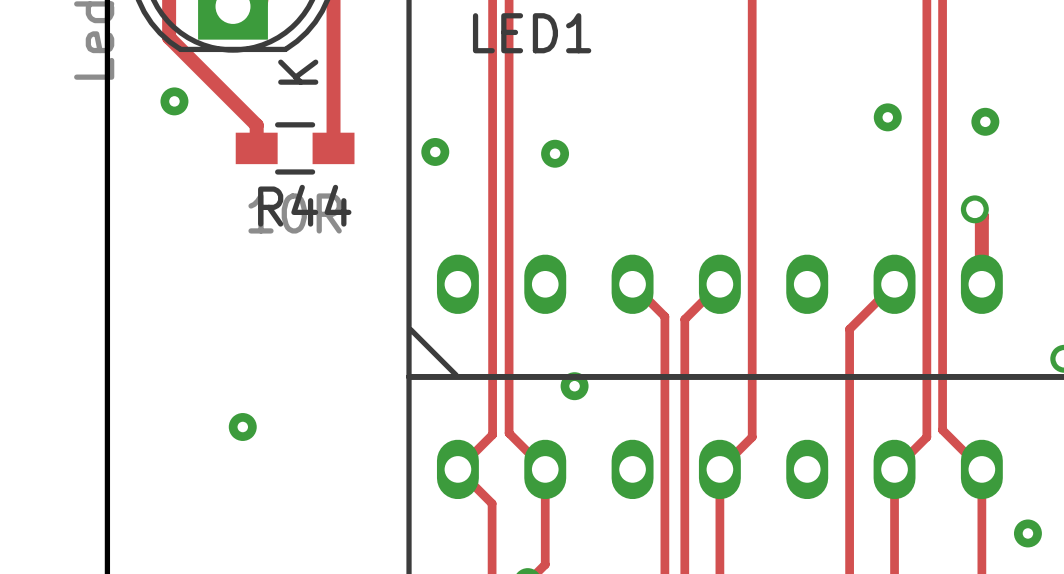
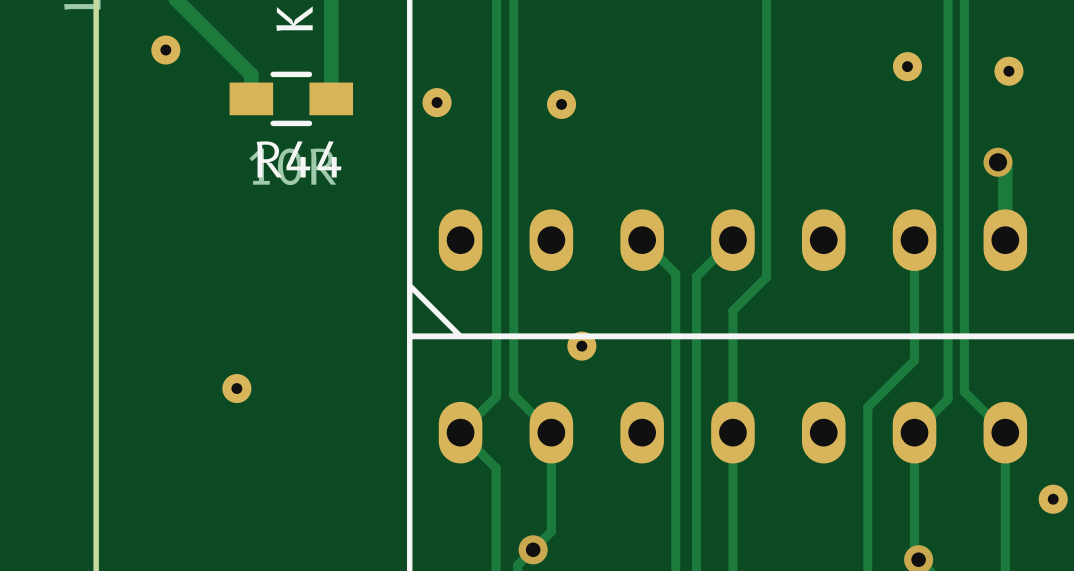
track: (894, 284) (849, 329) (849, 444) -> (914, 240) (914, 360) (867, 407)
track: (752, 320) (752, 437) (719, 469) -> (766, 277) (732, 310) (732, 432)

